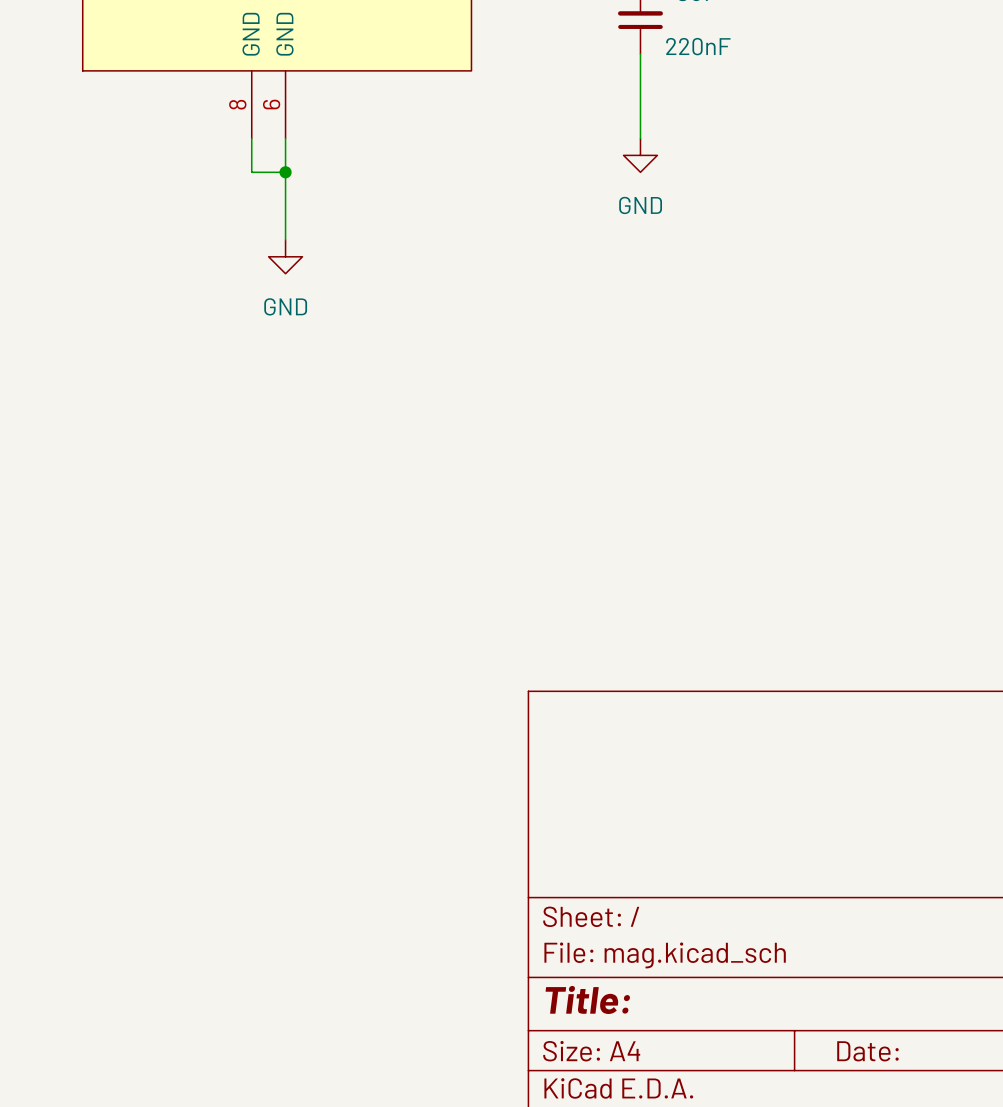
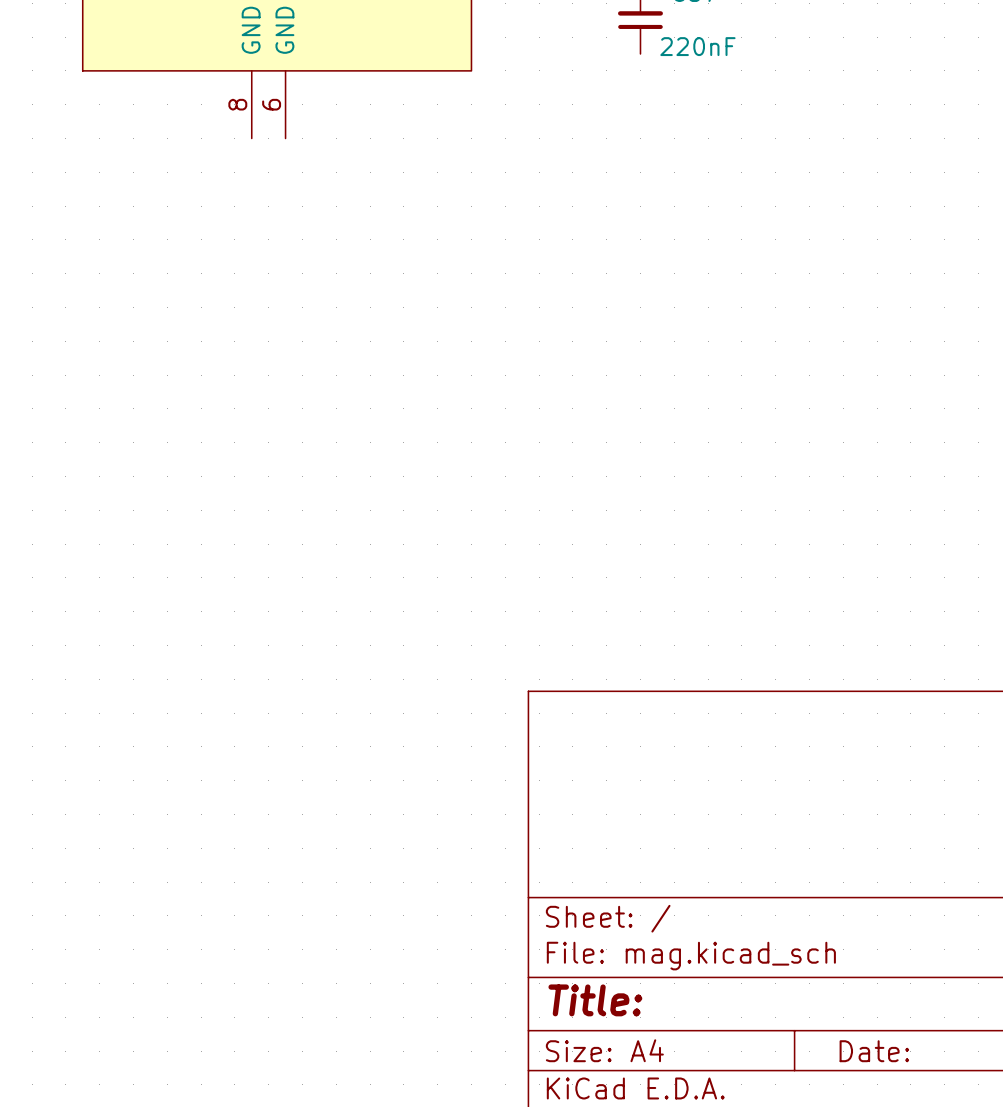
wire: (640, 53) (640, 138) -> none
wire: (251, 138) (251, 172) (285, 172) -> none
wire: (285, 138) (285, 239) -> none
power symbol: GND (640, 155) -> none
junction: (285, 172) -> none
power symbol: GND (285, 256) -> none

